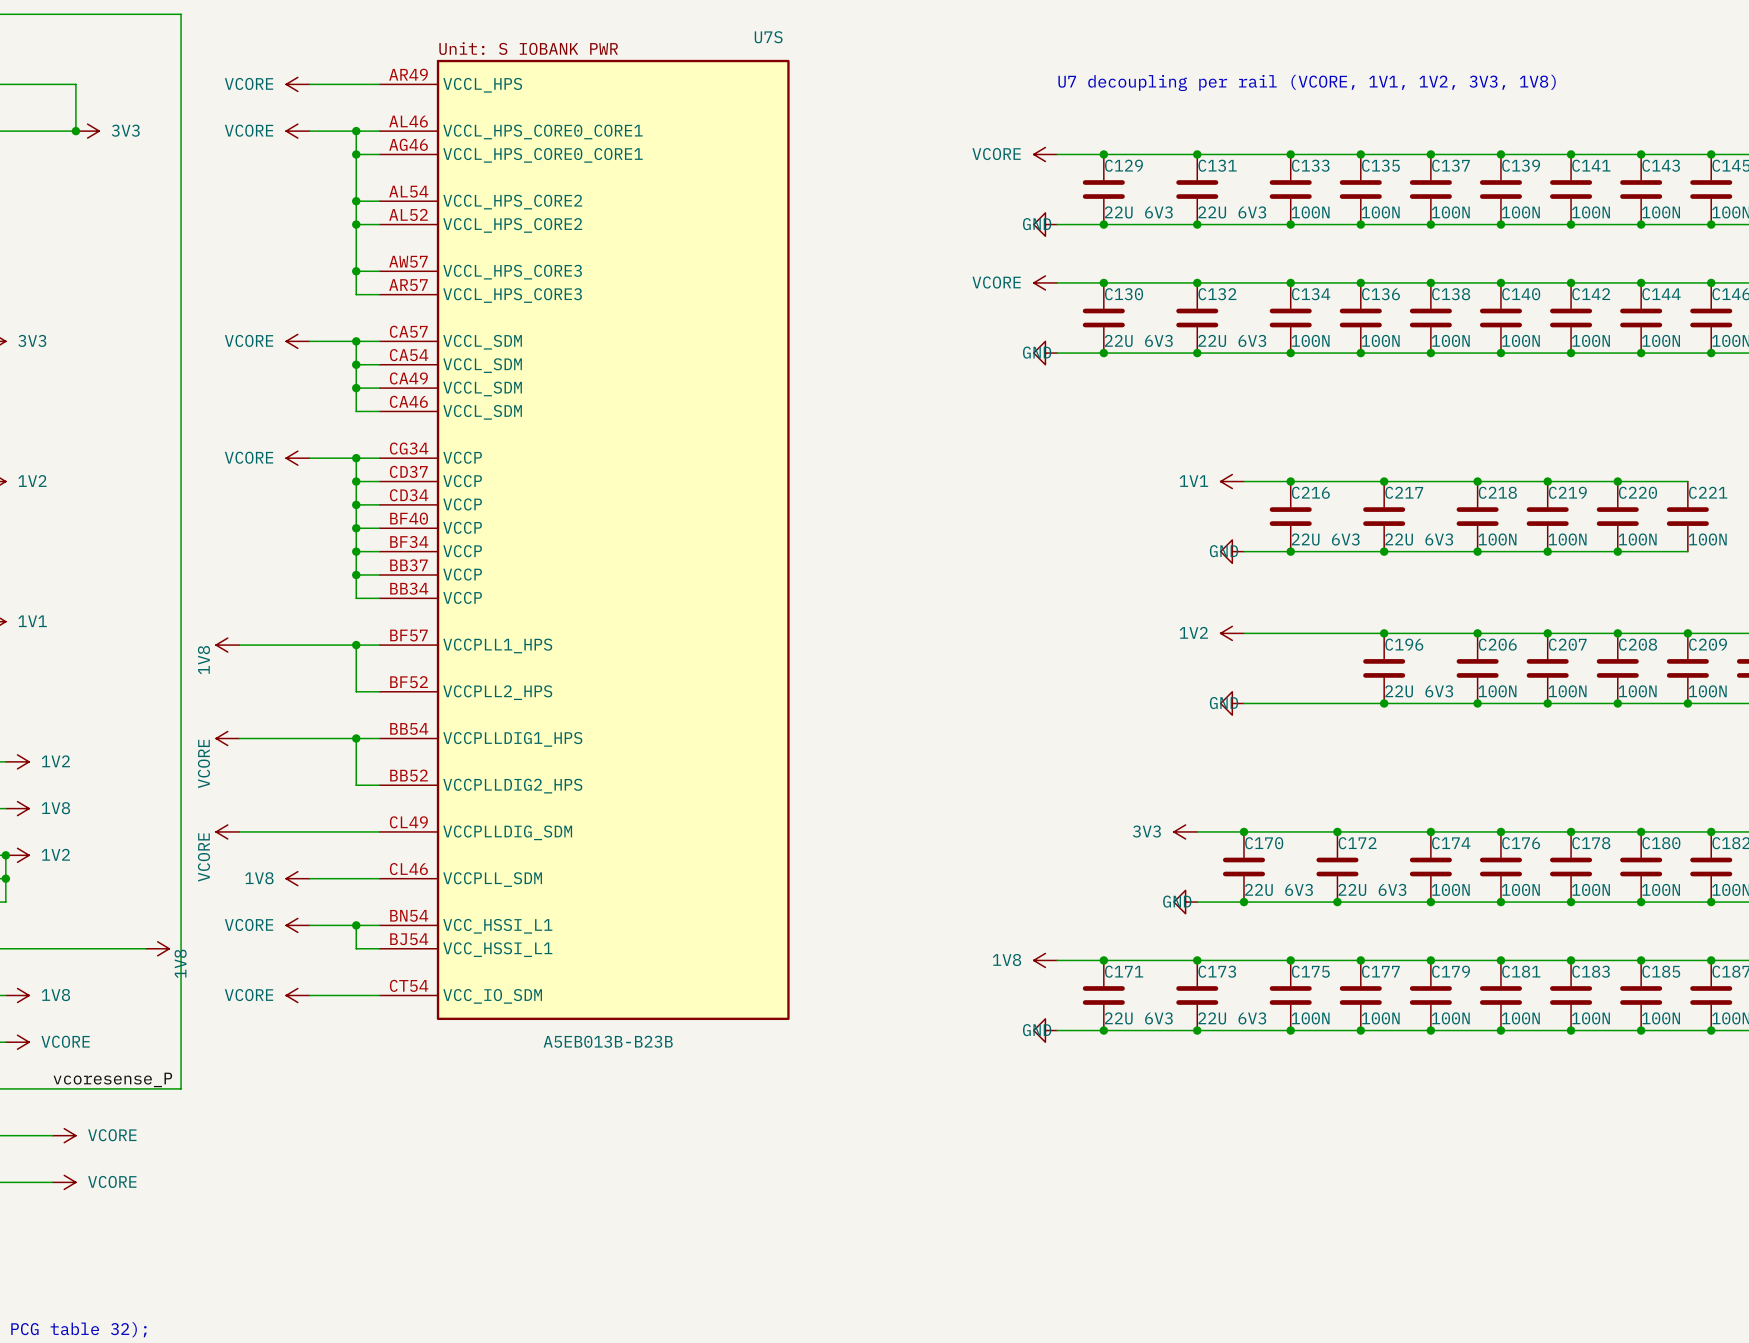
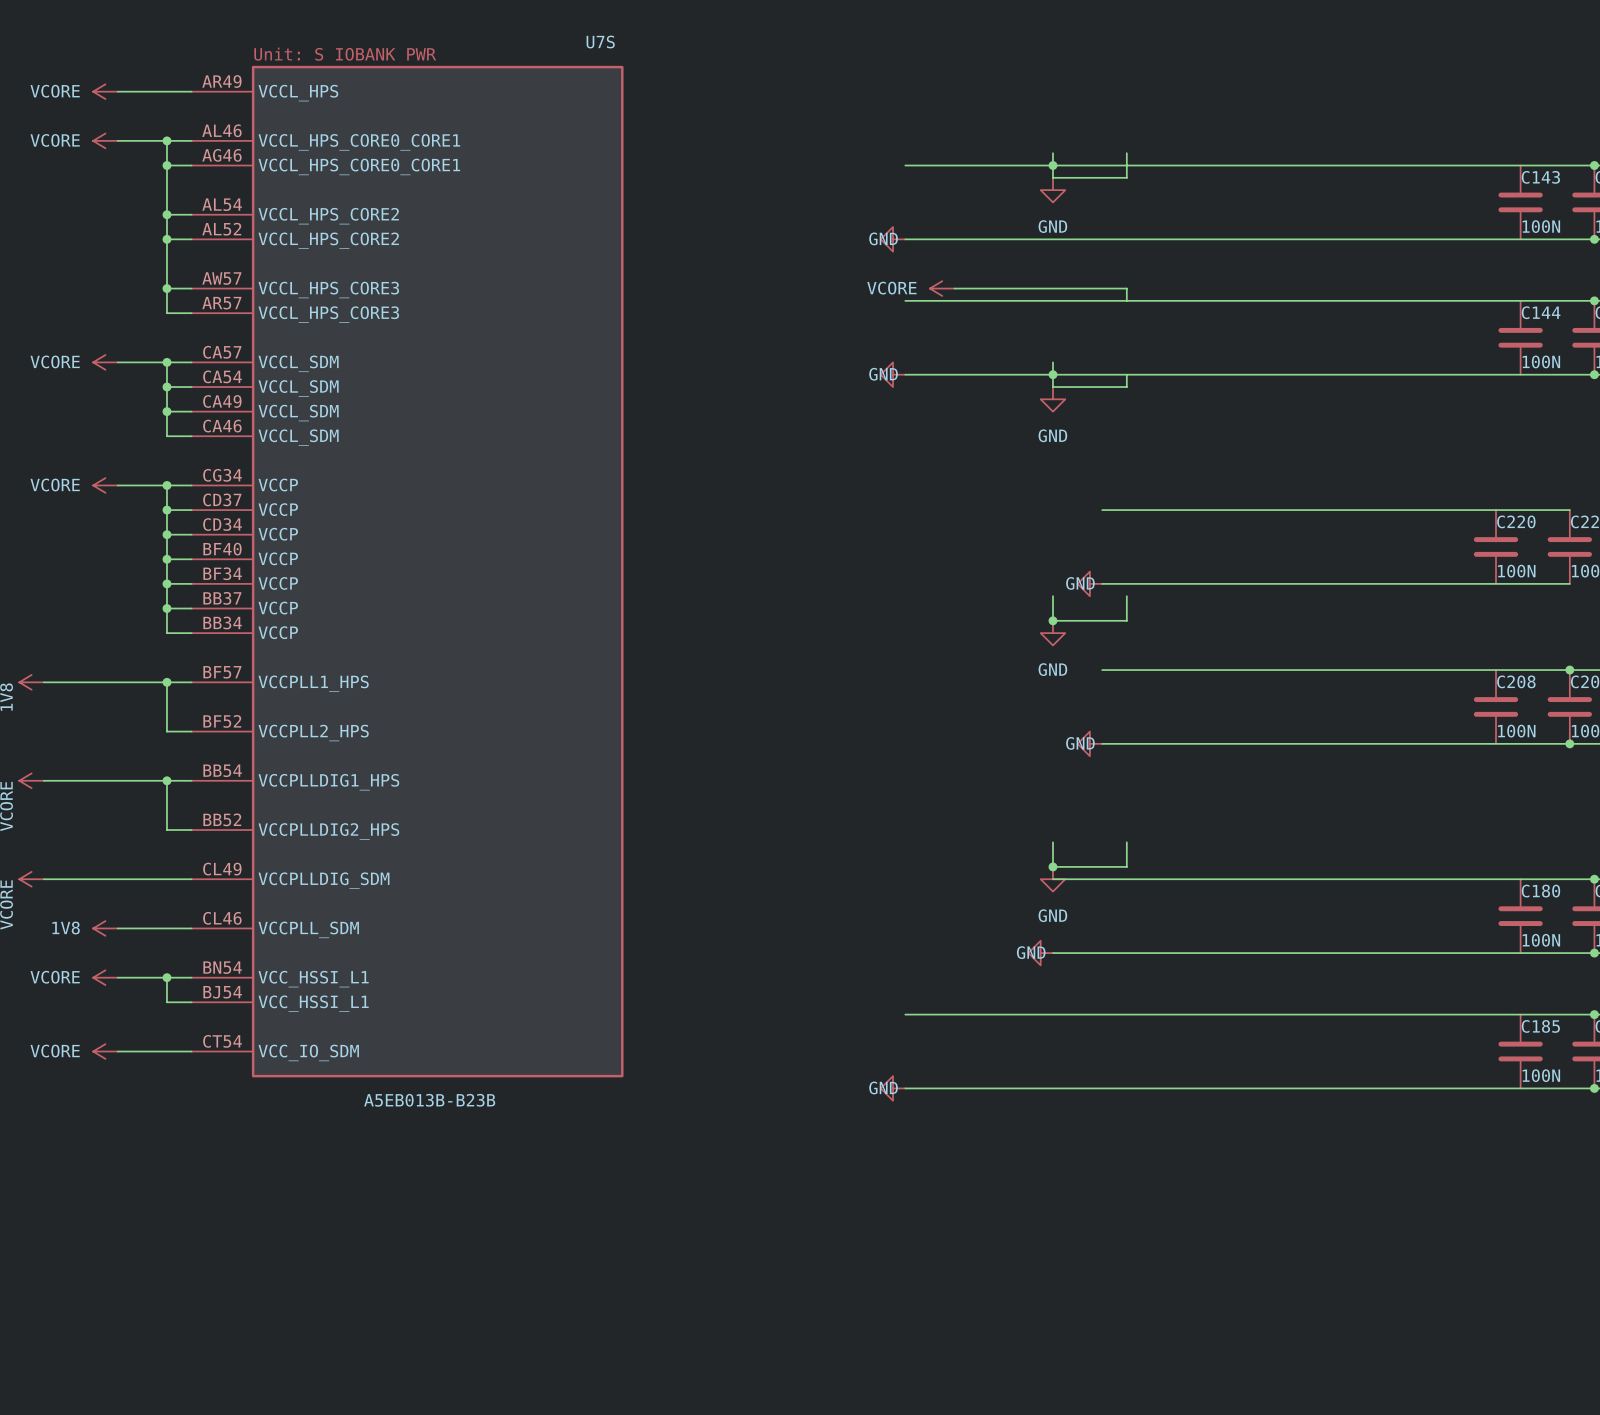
text: U7 decoupling per rail (VCORE, 1V1, 1V2, 3V3, 1V8) (1307, 82) -> none
wire: none -> (1052, 153) (1052, 177) (1126, 177) (1126, 153)
power symbol: VCORE (1045, 154) -> none
junction: (1103, 154) -> none
junction: (1290, 154) -> none
junction: (1360, 154) -> none
junction: (1430, 154) -> none
junction: (1500, 154) -> none
junction: (1571, 154) -> none
junction: (1641, 154) -> none
power symbol: none -> GND (1052, 190)
C129: 22U 6V3 (1103, 189) -> none
C131: 22U 6V3 (1197, 189) -> none
C133: 100N (1290, 189) -> none
C135: 100N (1360, 189) -> none
C137: 100N (1430, 189) -> none
C139: 100N (1500, 189) -> none
C141: 100N (1571, 189) -> none
junction: (1103, 224) -> none
junction: (1197, 224) -> none
junction: (1290, 224) -> none
junction: (1360, 224) -> none
junction: (1430, 224) -> none
junction: (1500, 224) -> none
junction: (1571, 224) -> none
junction: (1641, 224) -> none
wire: none -> (954, 288) (1126, 288) (1126, 300)
power symbol position: VCORE (1045, 282) -> VCORE (942, 288)
junction: (1103, 282) -> none
junction: (1197, 282) -> none
junction: (1290, 282) -> none
junction: (1360, 282) -> none
junction: (1430, 282) -> none
junction: (1500, 282) -> none
junction: (1571, 282) -> none
junction: (1641, 282) -> none
C130: 22U 6V3 (1103, 318) -> none
C132: 22U 6V3 (1197, 318) -> none
C134: 100N (1290, 318) -> none
C136: 100N (1360, 318) -> none
C138: 100N (1430, 318) -> none
C140: 100N (1500, 318) -> none
C142: 100N (1571, 318) -> none
wire: none -> (1052, 362) (1052, 387) (1126, 387) (1126, 374)
junction: (1103, 353) -> none
junction: (1290, 353) -> none
junction: (1360, 353) -> none
junction: (1430, 353) -> none
junction: (1500, 353) -> none
junction: (1571, 353) -> none
junction: (1641, 353) -> none
power symbol: none -> GND (1052, 399)
power symbol: 1V1 (1232, 481) -> none
junction: (1290, 481) -> none
junction: (1384, 481) -> none
junction: (1477, 481) -> none
junction: (1547, 481) -> none
junction: (1617, 481) -> none
C216: 22U 6V3 (1290, 516) -> none
C217: 22U 6V3 (1384, 516) -> none
C218: 100N (1477, 516) -> none
C219: 100N (1547, 516) -> none
junction: (1290, 551) -> none
junction: (1384, 551) -> none
junction: (1477, 551) -> none
junction: (1547, 551) -> none
junction: (1617, 551) -> none
wire: none -> (1052, 596) (1052, 620) (1126, 620) (1126, 596)
junction: none -> (1052, 620)
power symbol: none -> GND (1052, 633)
power symbol: 1V2 (1232, 633) -> none
junction: (1384, 633) -> none
junction: (1477, 633) -> none
junction: (1547, 633) -> none
junction: (1617, 633) -> none
C196: 22U 6V3 (1384, 668) -> none
C206: 100N (1477, 668) -> none
C207: 100N (1547, 668) -> none
junction: (1384, 703) -> none
junction: (1477, 703) -> none
junction: (1547, 703) -> none
junction: (1617, 703) -> none
wire: none -> (1052, 842) (1052, 866) (1126, 866) (1126, 842)
junction: none -> (1052, 866)
power symbol: 3V3 (1185, 831) -> none
power symbol: none -> GND (1052, 879)
junction: (1243, 831) -> none
junction: (1337, 831) -> none
junction: (1430, 831) -> none
junction: (1500, 831) -> none
junction: (1571, 831) -> none
junction: (1641, 831) -> none
C170: 22U 6V3 (1243, 867) -> none
C172: 22U 6V3 (1337, 867) -> none
C174: 100N (1430, 867) -> none
C176: 100N (1500, 867) -> none
C178: 100N (1571, 867) -> none
junction: (1243, 902) -> none
junction: (1337, 902) -> none
junction: (1430, 902) -> none
junction: (1500, 902) -> none
junction: (1571, 902) -> none
junction: (1641, 902) -> none
power symbol: 1V8 (1045, 960) -> none
junction: (1103, 960) -> none
junction: (1197, 960) -> none
junction: (1290, 960) -> none
junction: (1360, 960) -> none
junction: (1430, 960) -> none
junction: (1500, 960) -> none
junction: (1571, 960) -> none
junction: (1641, 960) -> none
C171: 22U 6V3 (1103, 995) -> none
C173: 22U 6V3 (1197, 995) -> none
C175: 100N (1290, 995) -> none
C177: 100N (1360, 995) -> none
C179: 100N (1430, 995) -> none
C181: 100N (1500, 995) -> none
C183: 100N (1571, 995) -> none
junction: (1103, 1030) -> none
junction: (1197, 1030) -> none
junction: (1290, 1030) -> none
junction: (1360, 1030) -> none
junction: (1430, 1030) -> none
junction: (1500, 1030) -> none
junction: (1571, 1030) -> none
junction: (1641, 1030) -> none

